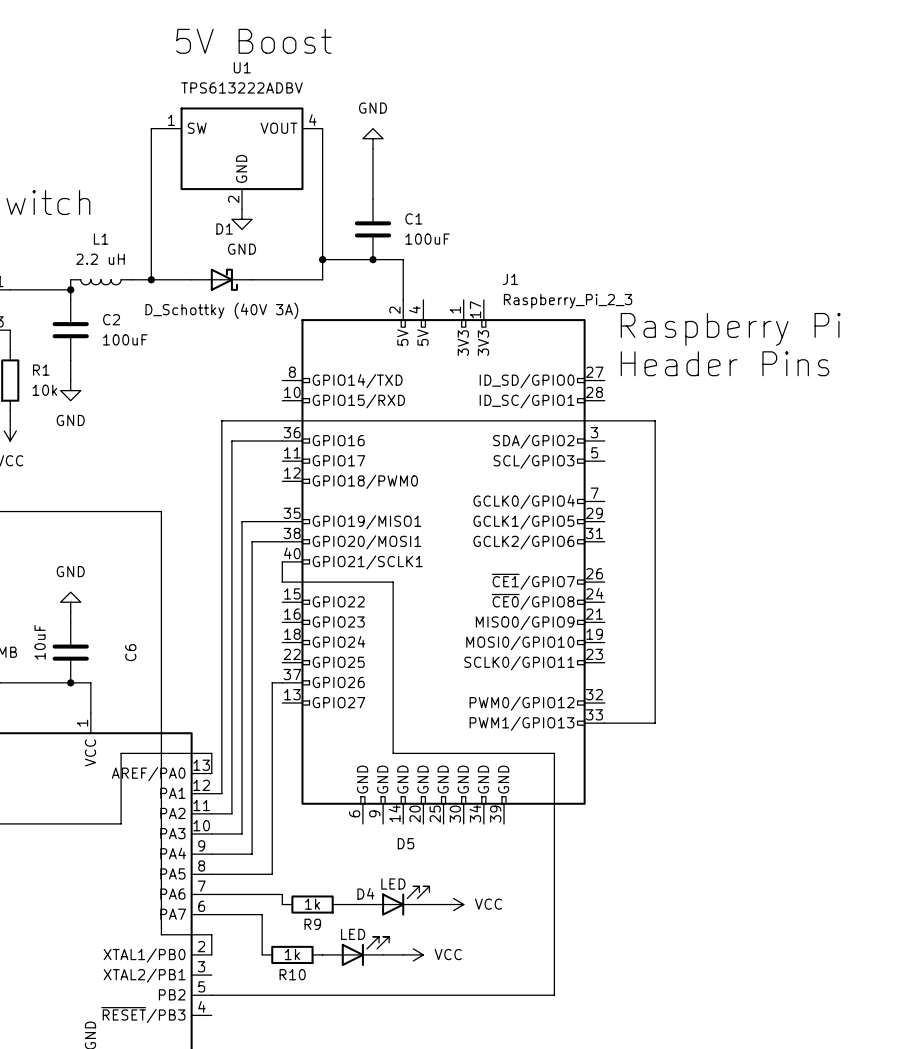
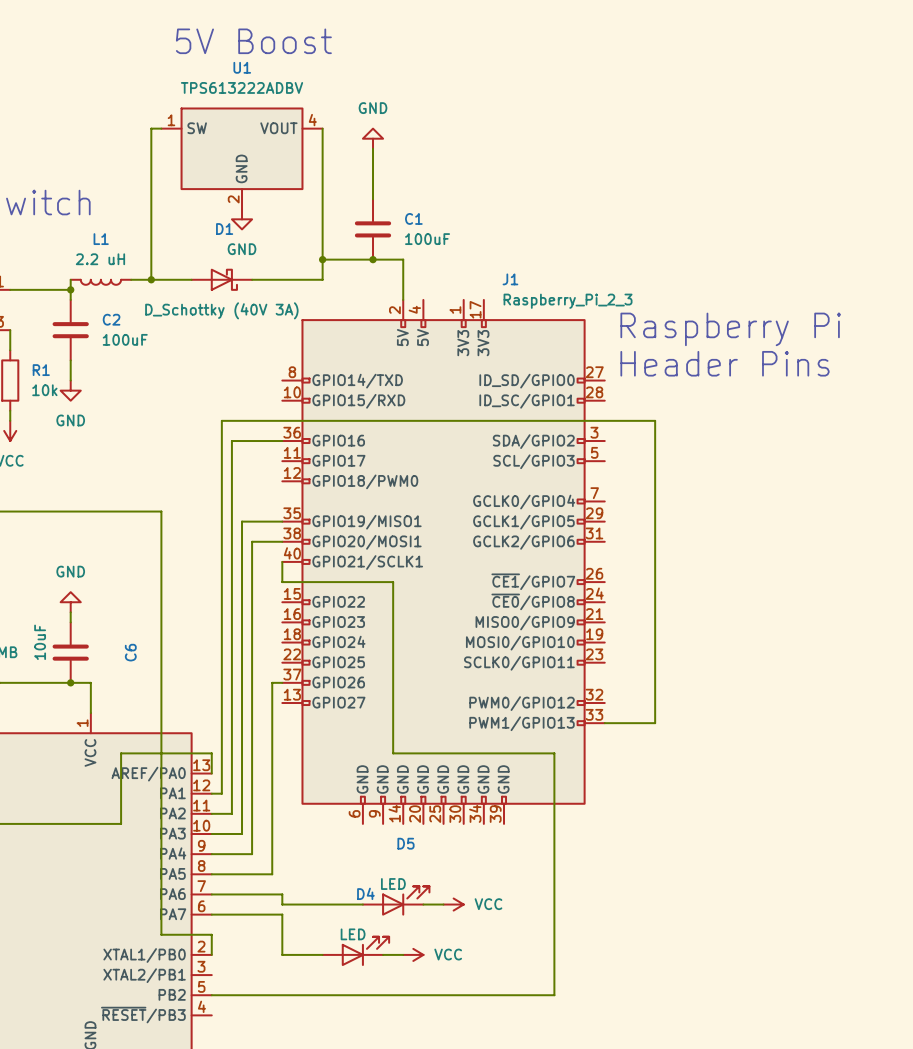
wire: none -> (282, 904) (342, 904)
R9: 1k (312, 904) -> none
wire: (262, 914) (262, 954) -> (262, 914) (282, 914) (282, 954) (322, 954)
R10: 1k (292, 954) -> none

